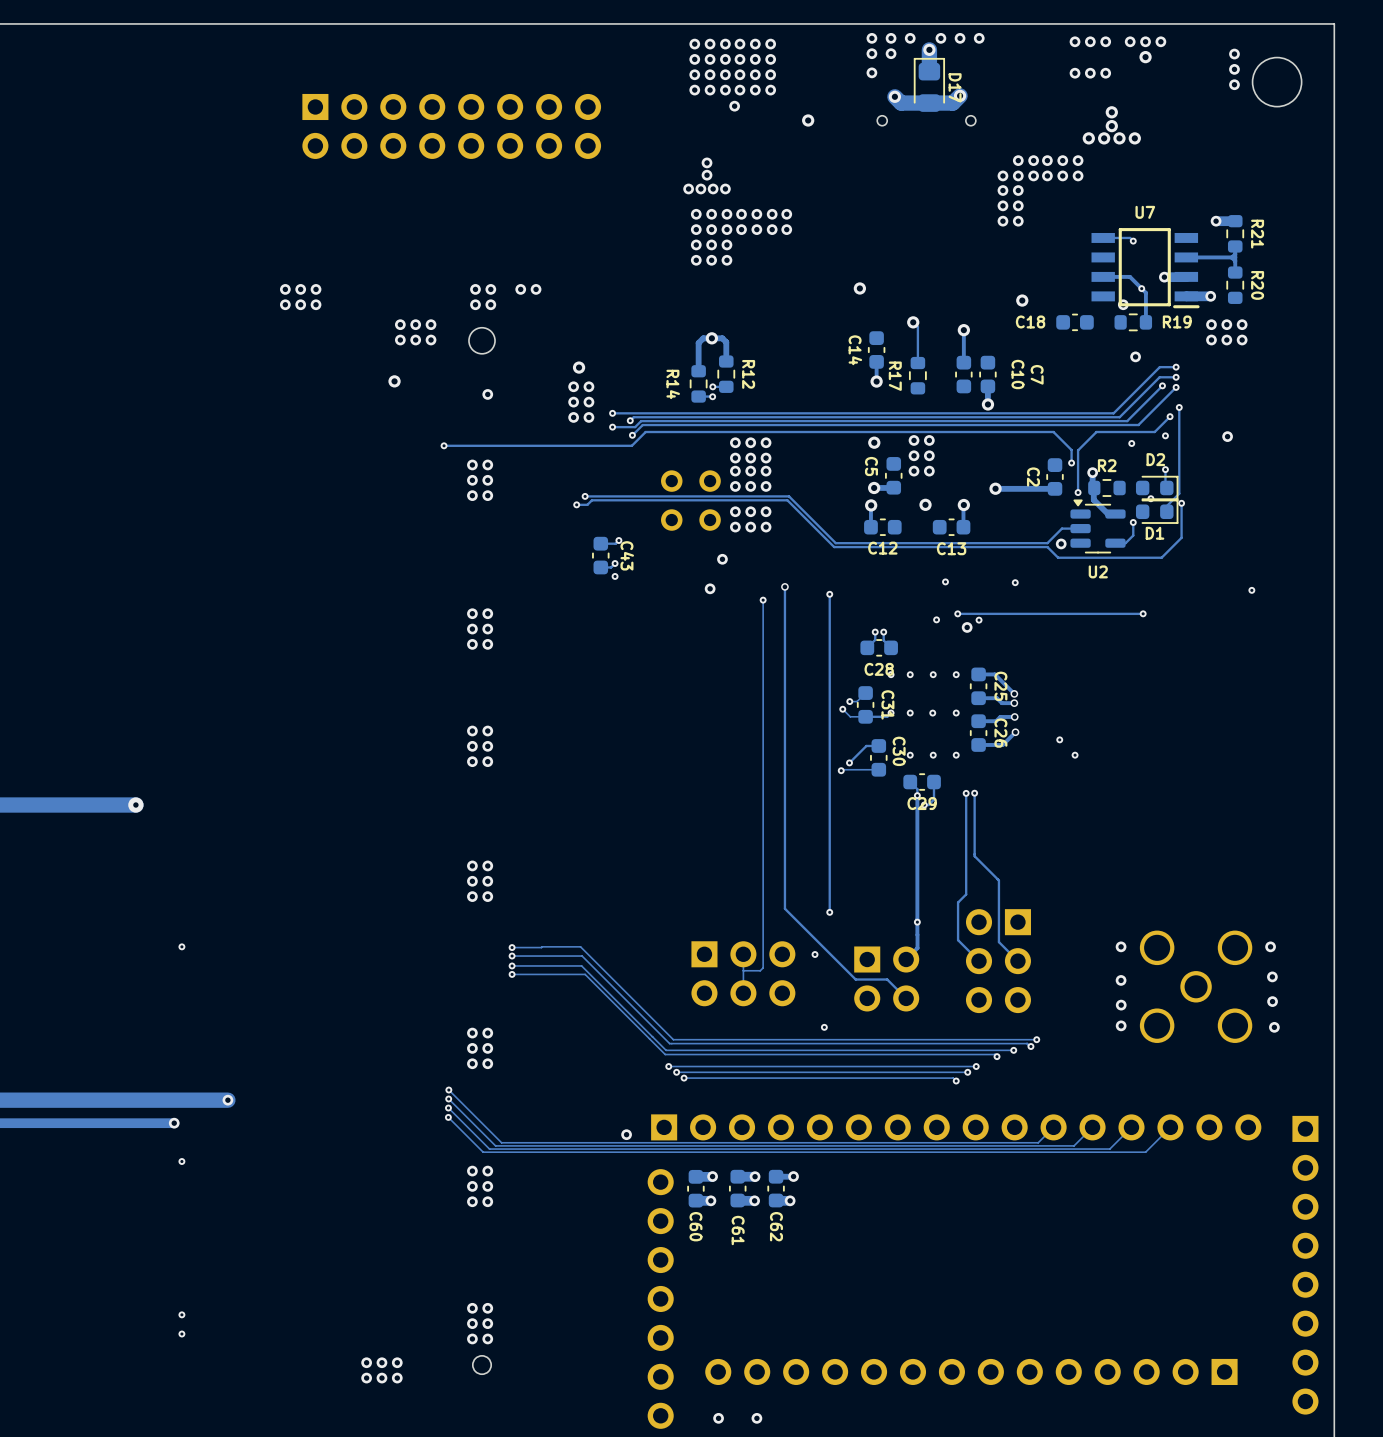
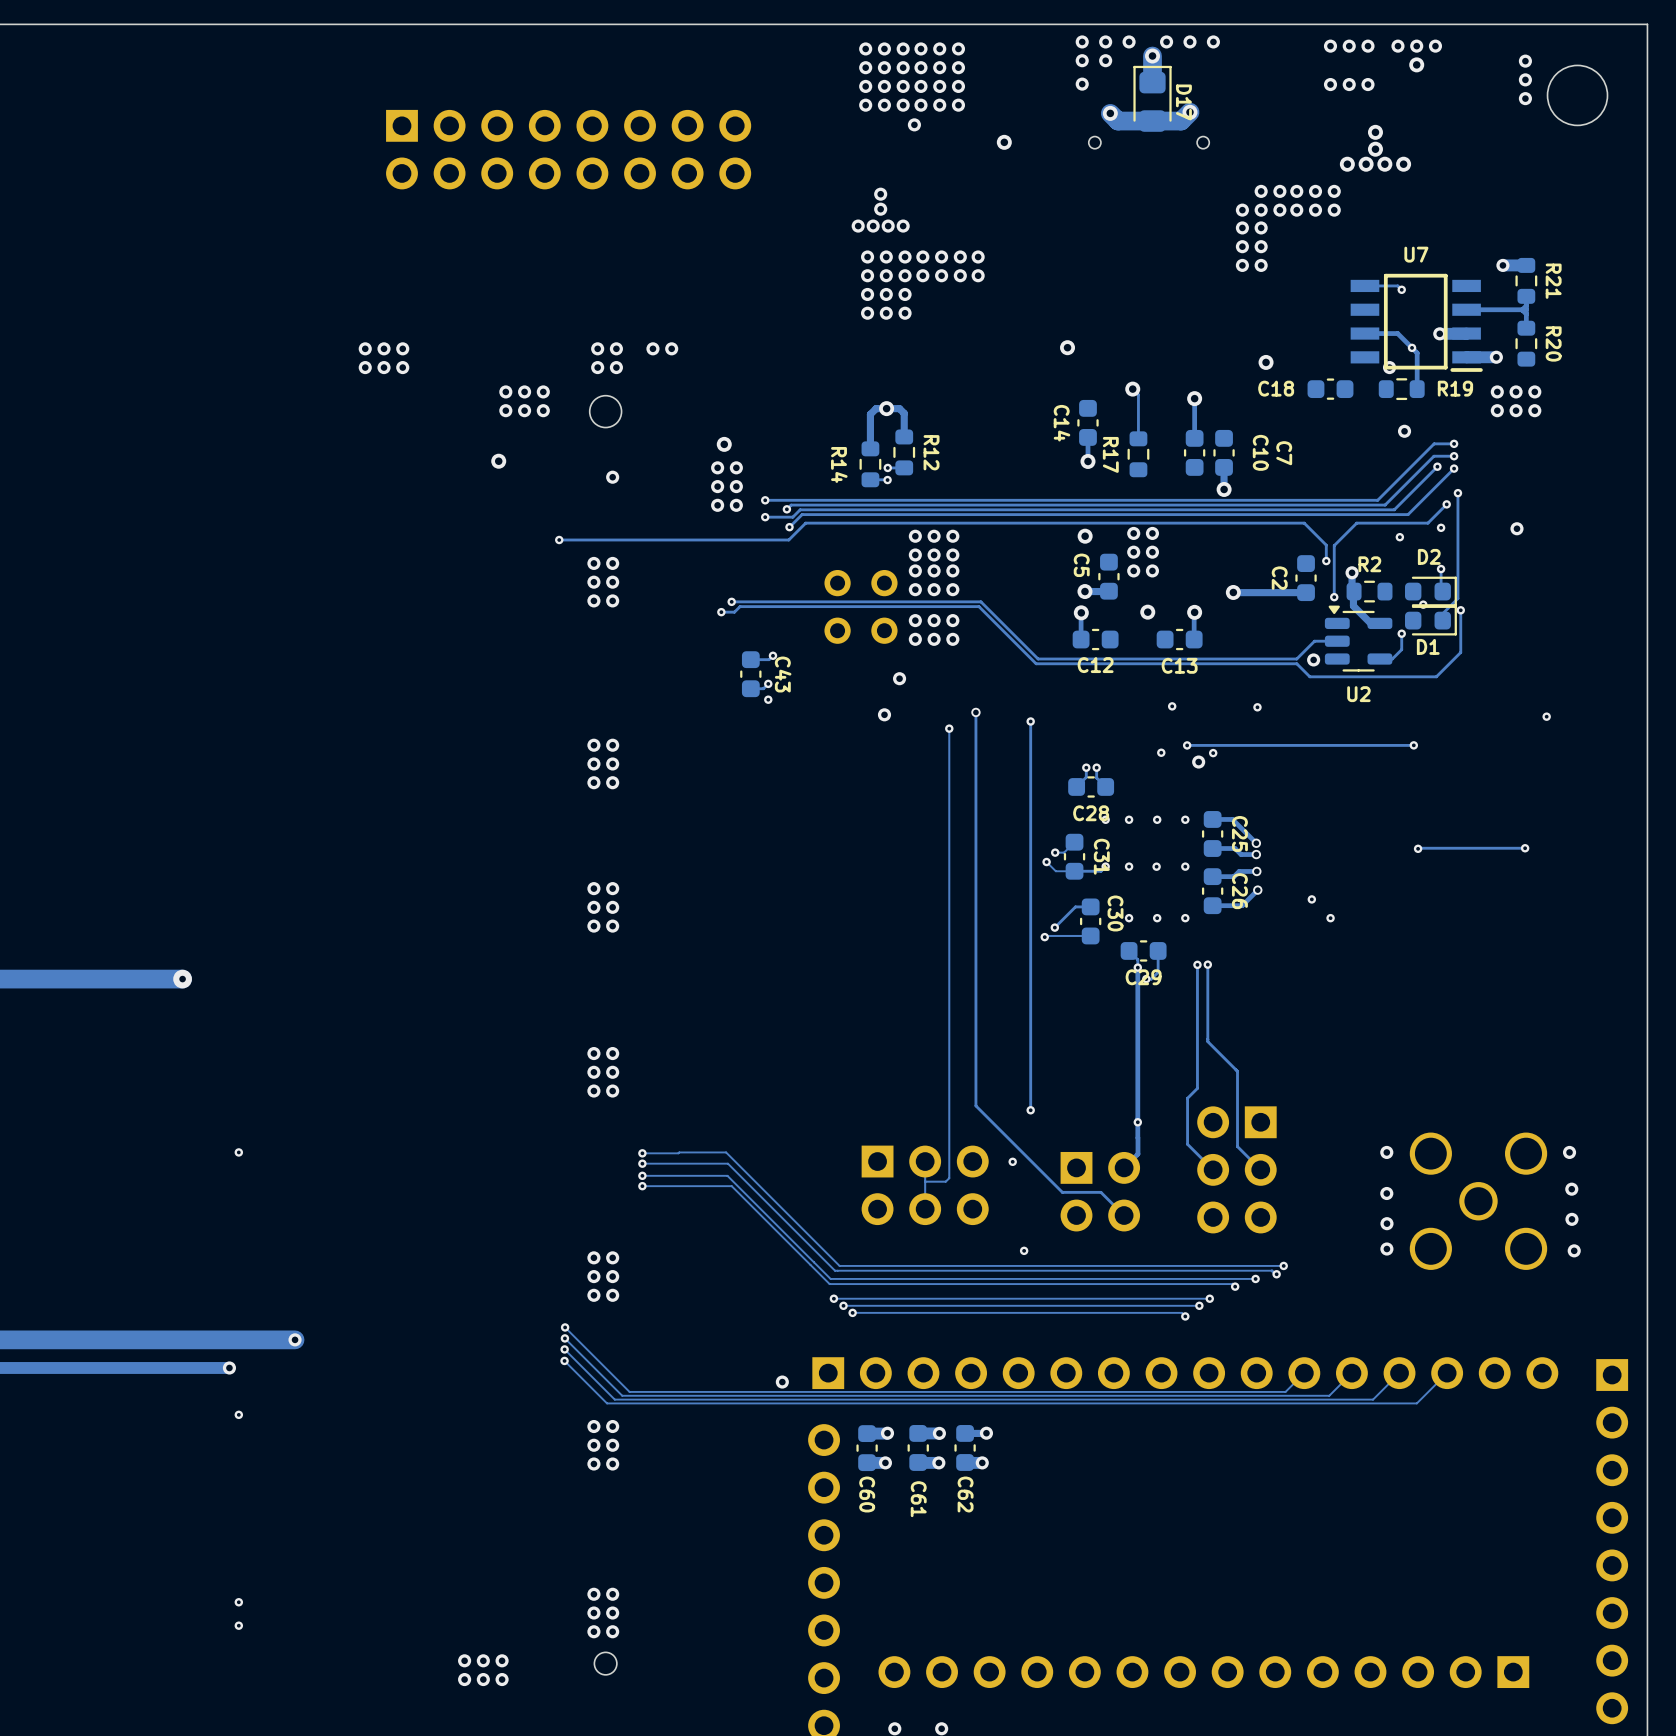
track: none -> (1525, 848) (1418, 848)
via: none -> (1525, 848)
via: none -> (1418, 848)

